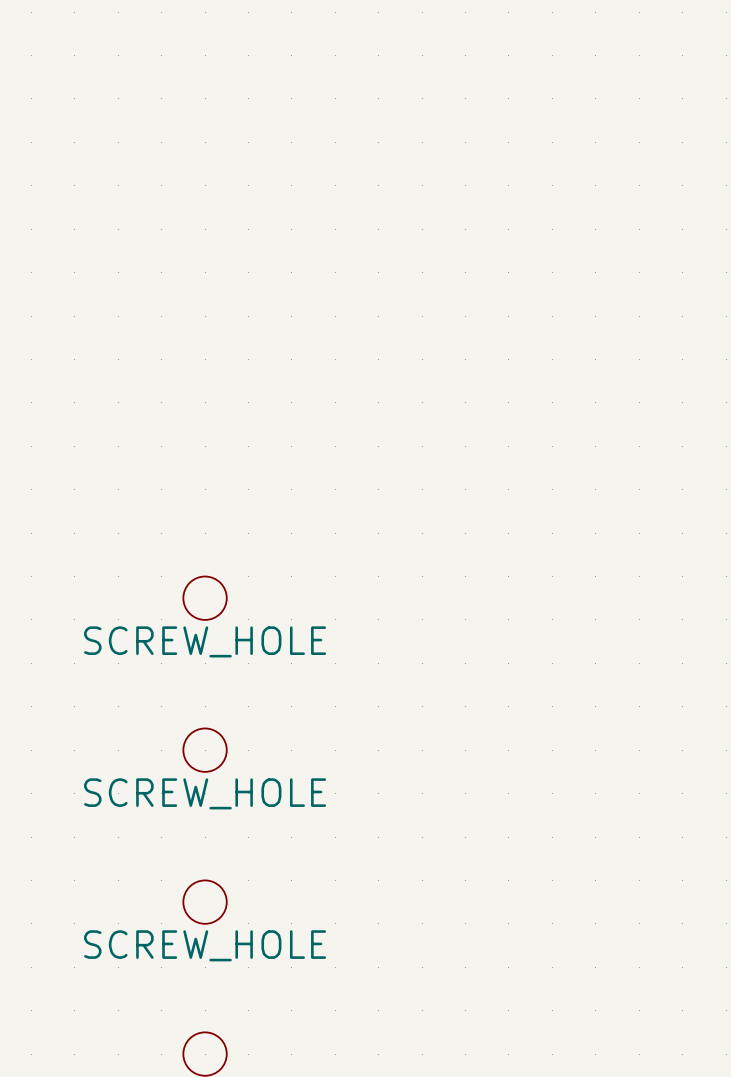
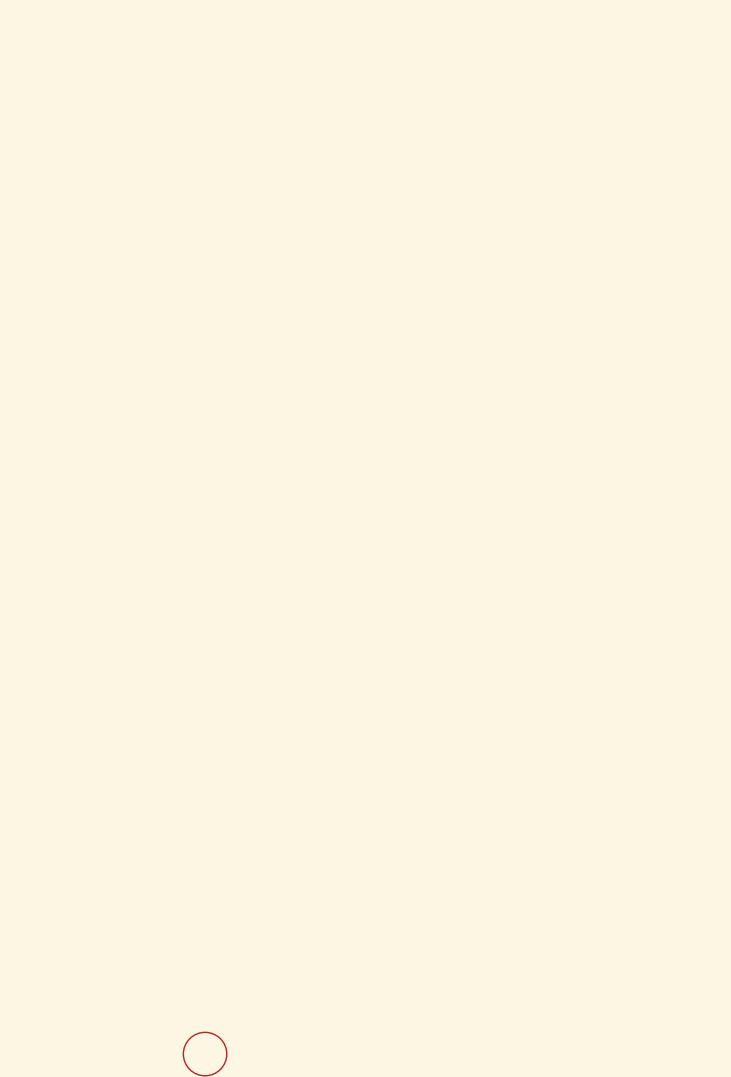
part: SCREW_HOLE (205, 598) -> none
part: SCREW_HOLE (205, 750) -> none
part: SCREW_HOLE (205, 902) -> none

